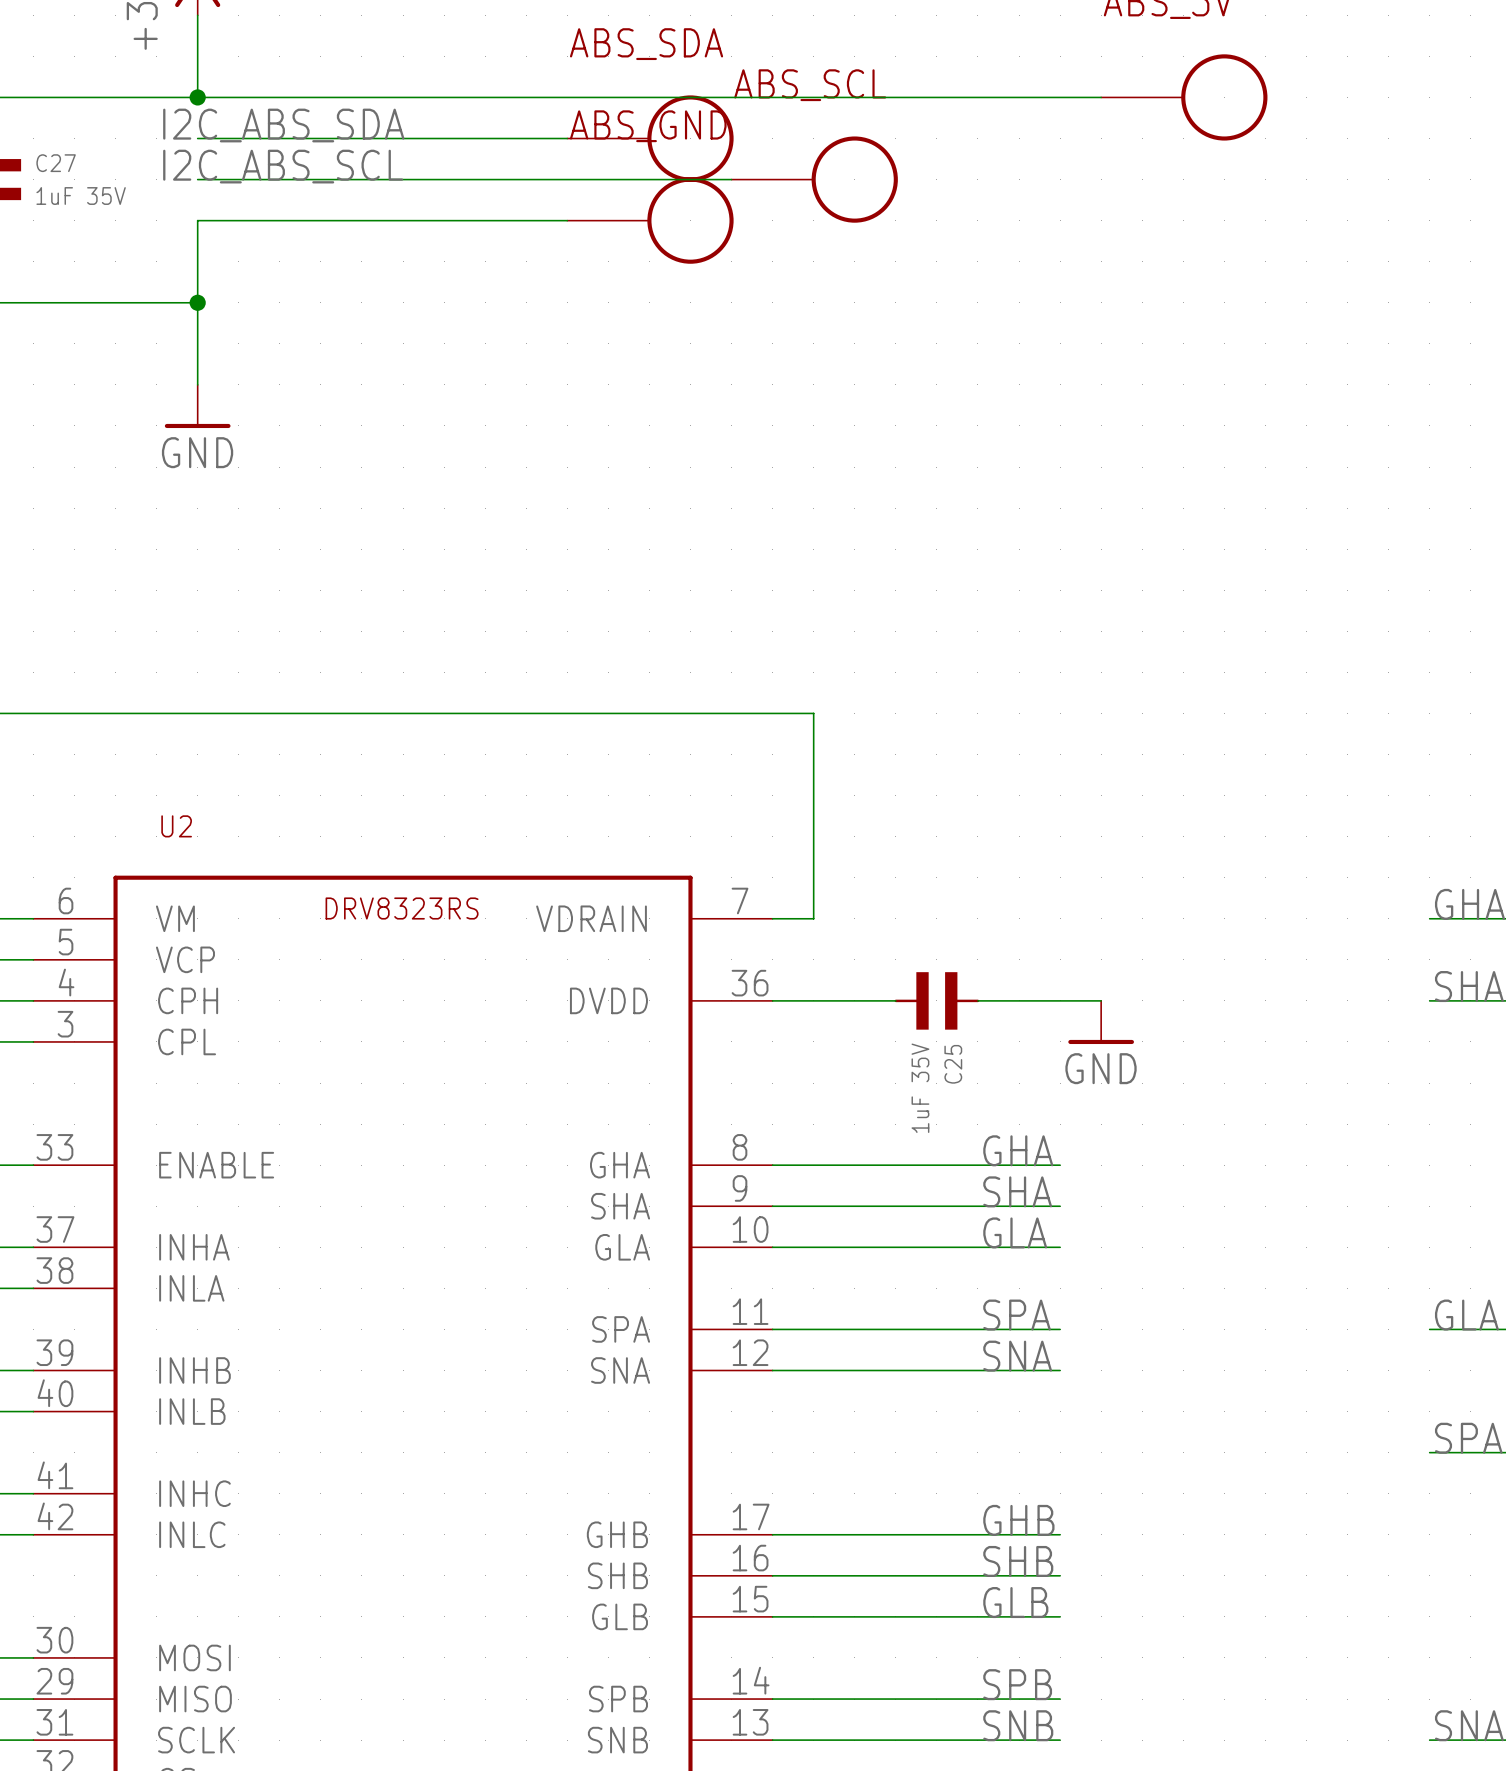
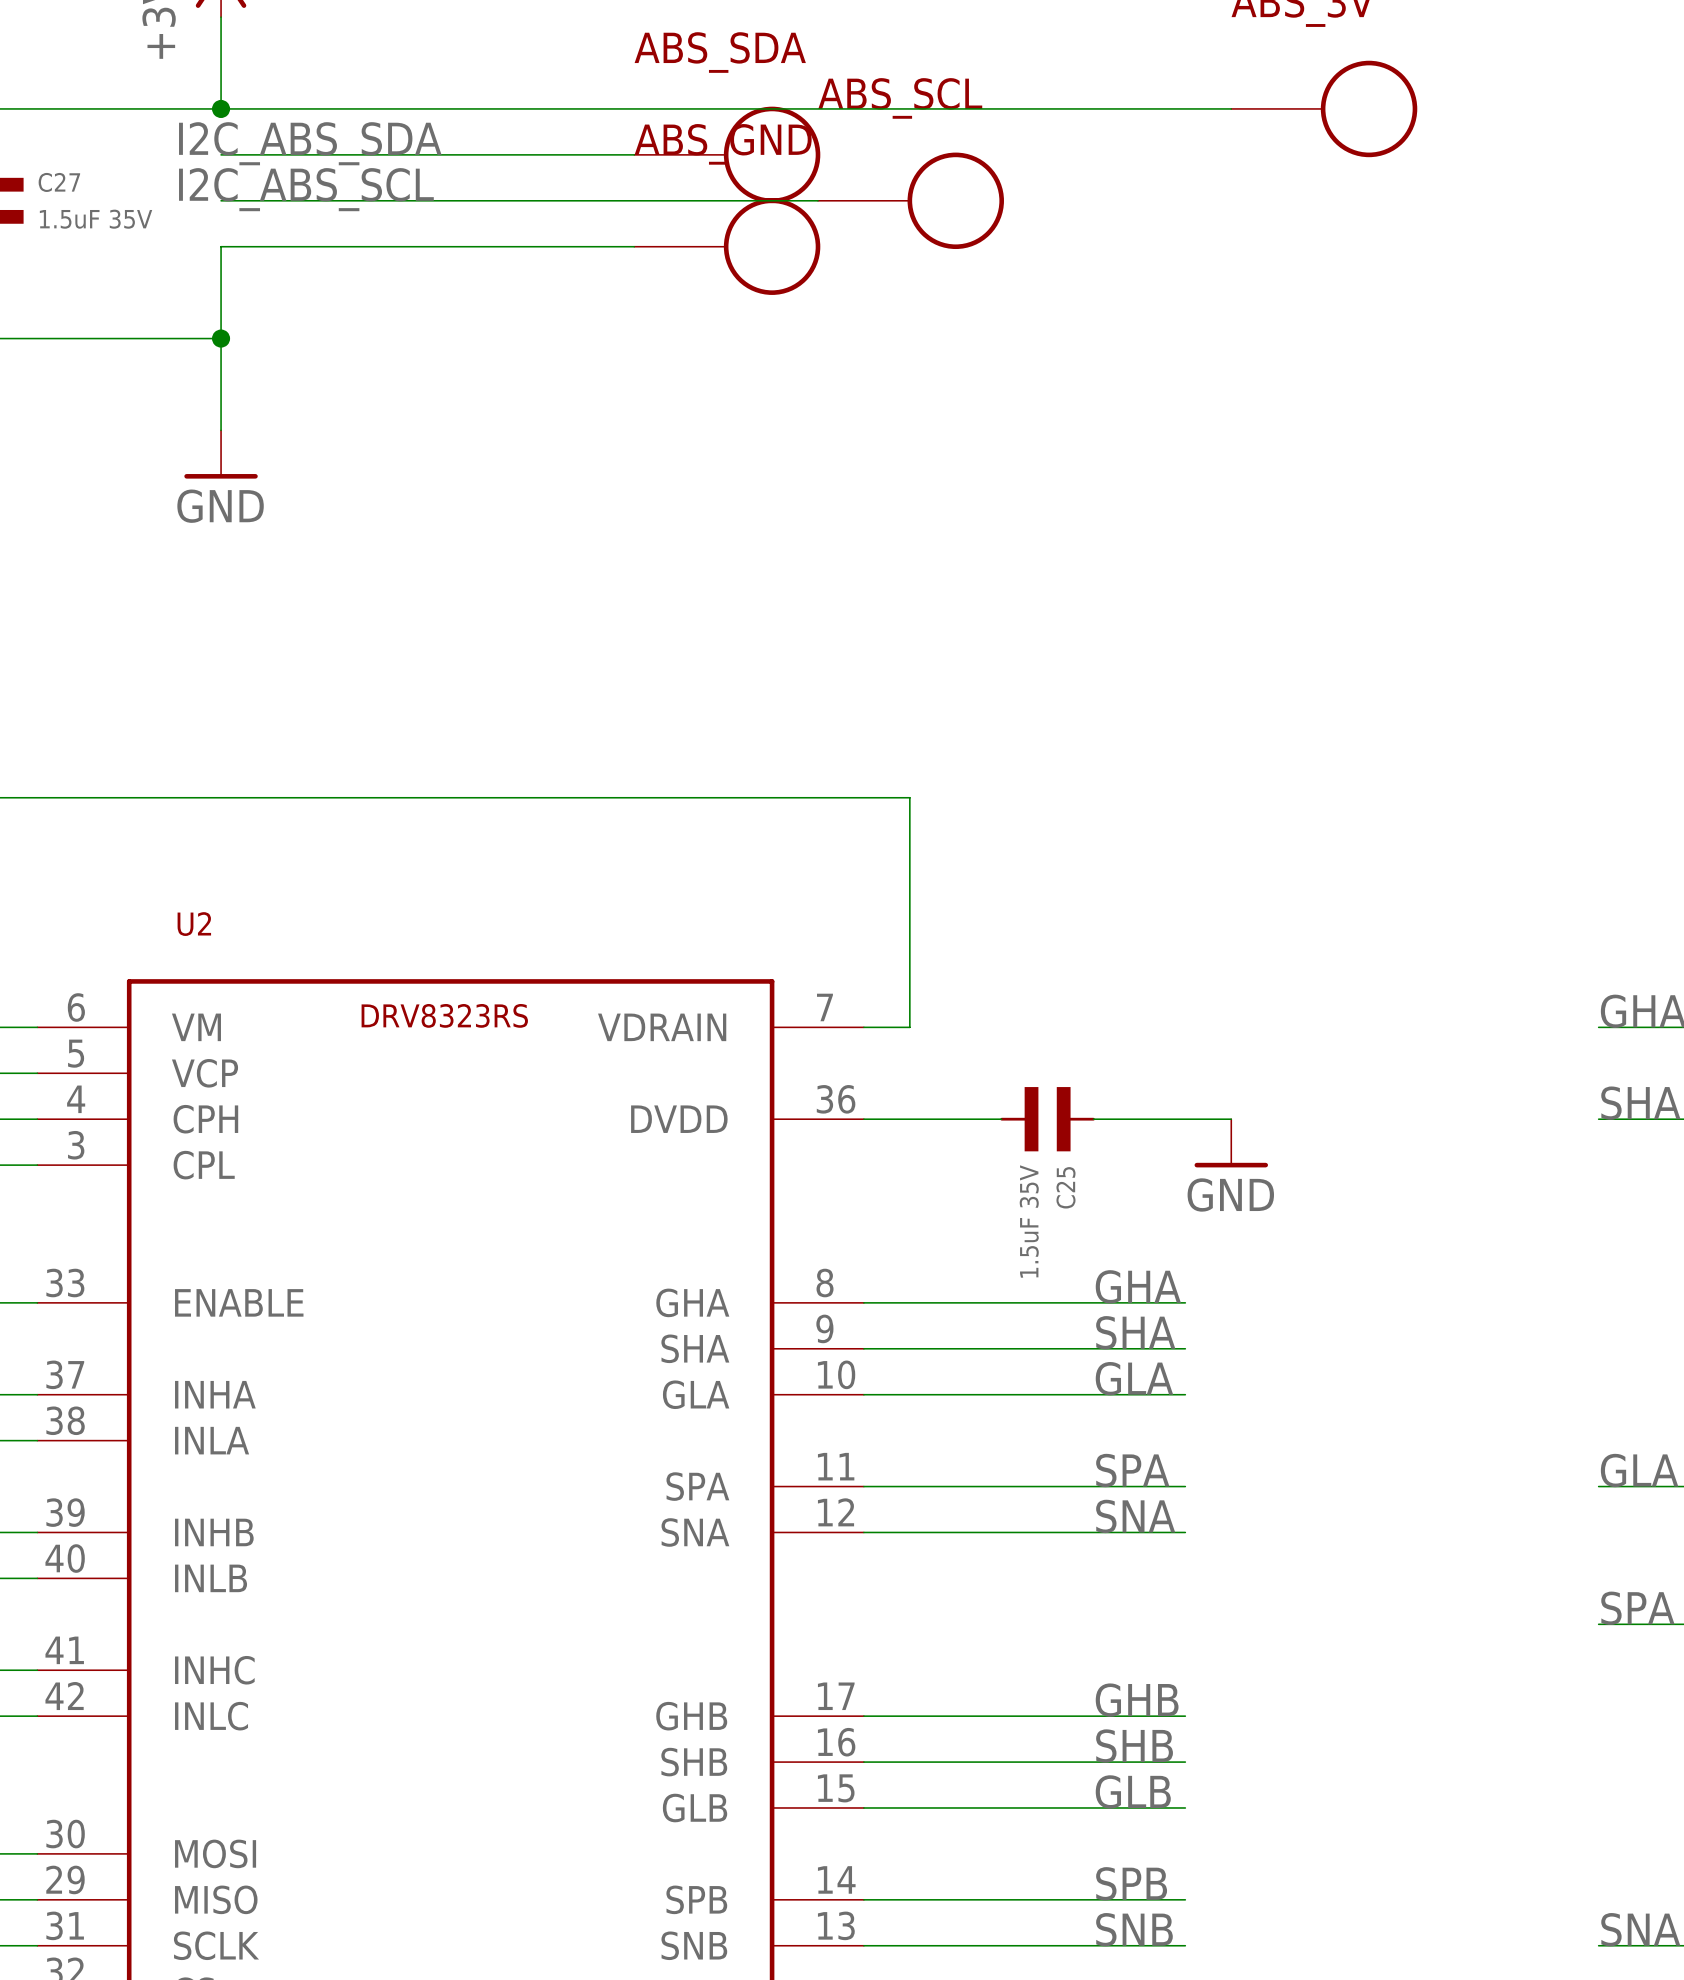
C27 value: 1uF 35V (81, 196) -> 1.5uF 35V (96, 219)
C25 value: 1uF 35V (920, 1088) -> 1.5uF 35V (1029, 1221)

